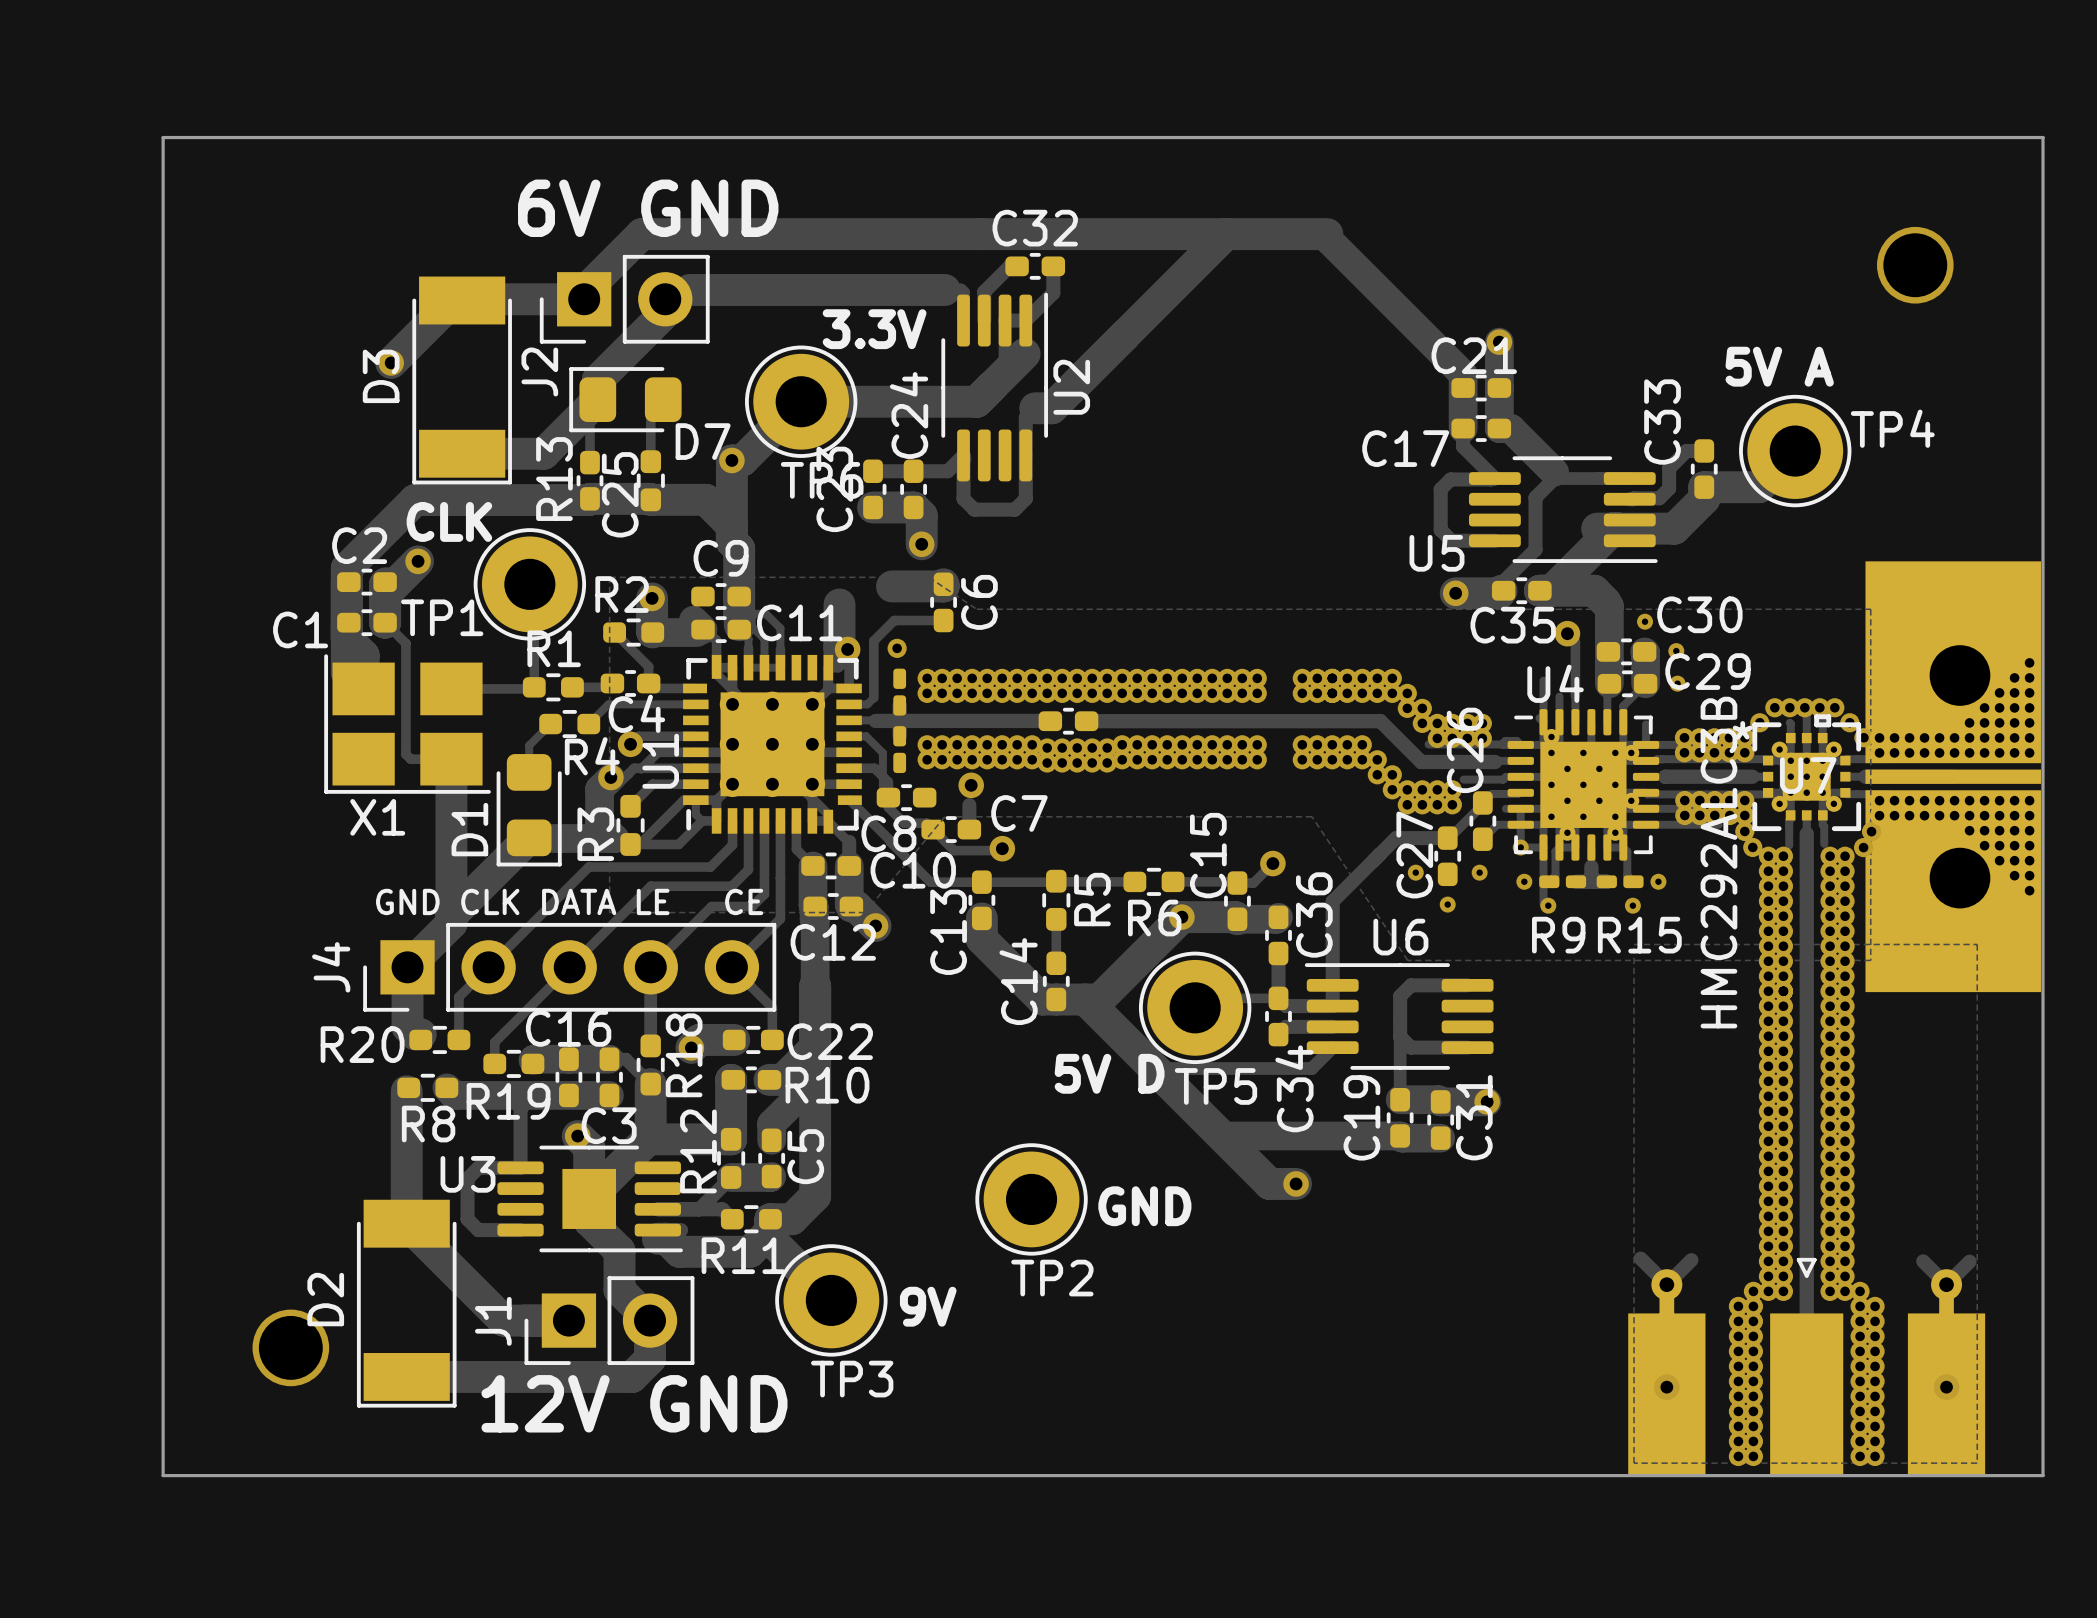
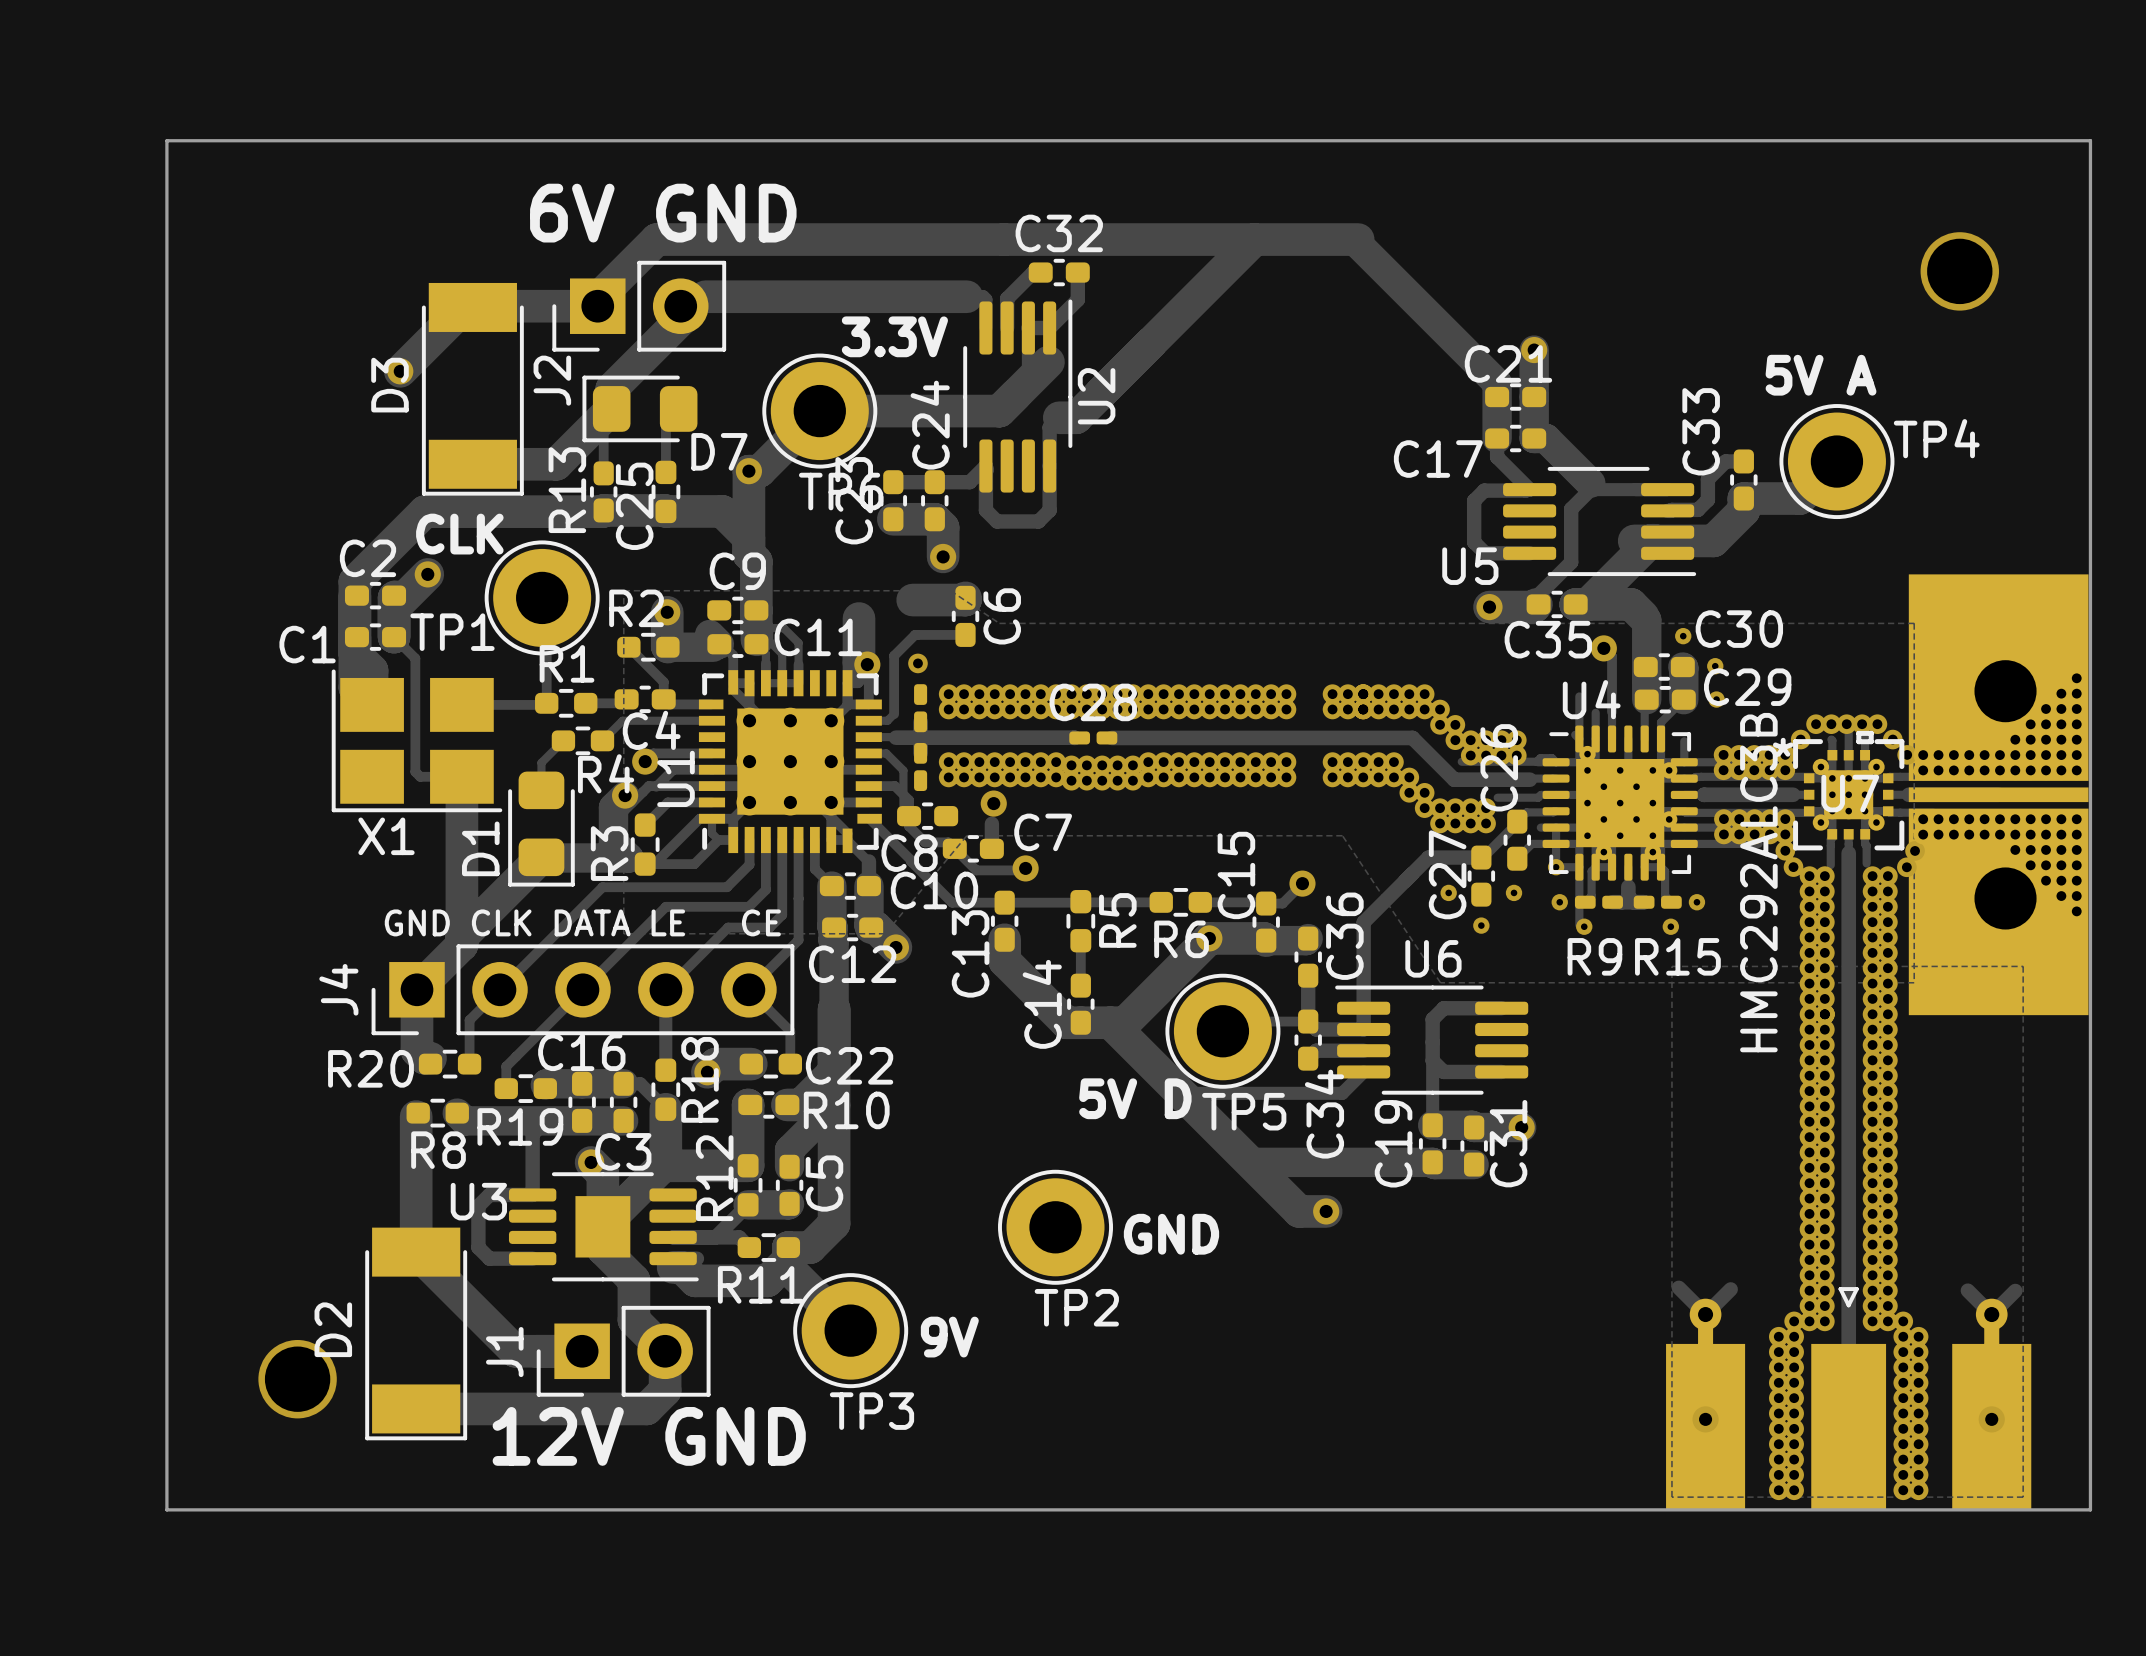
part: (1068, 721) -> none
C28: none -> (1093, 737)

